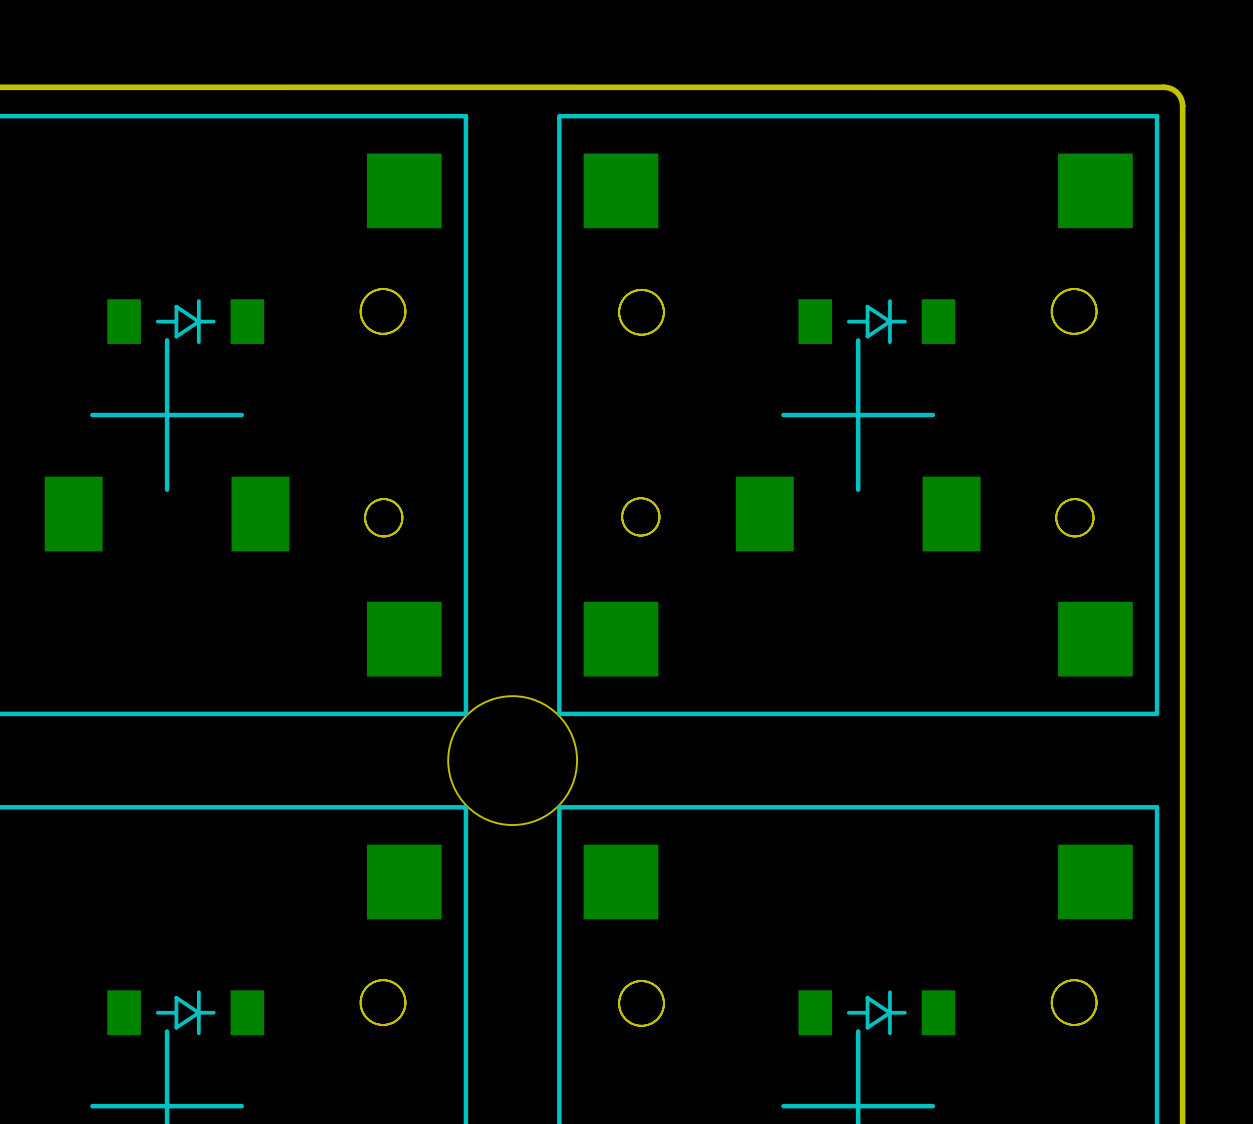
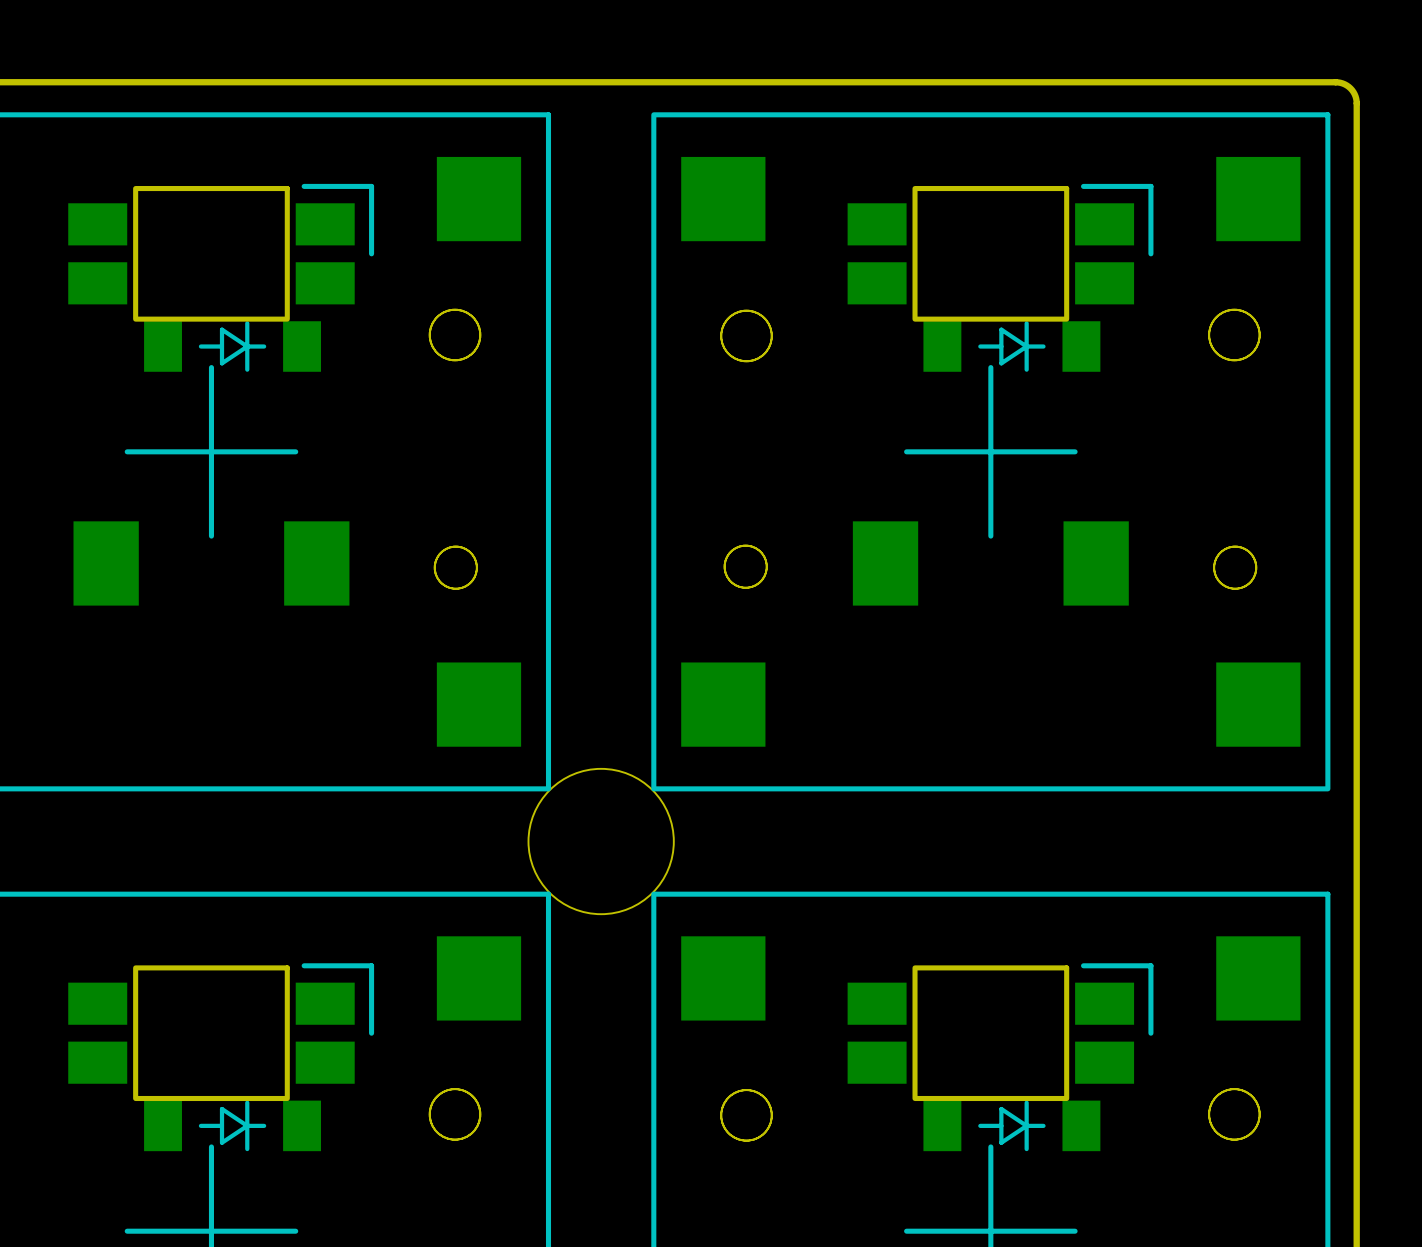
part: none -> (221, 252)
part: none -> (1000, 252)
part: none -> (221, 1032)
part: none -> (1000, 1032)

